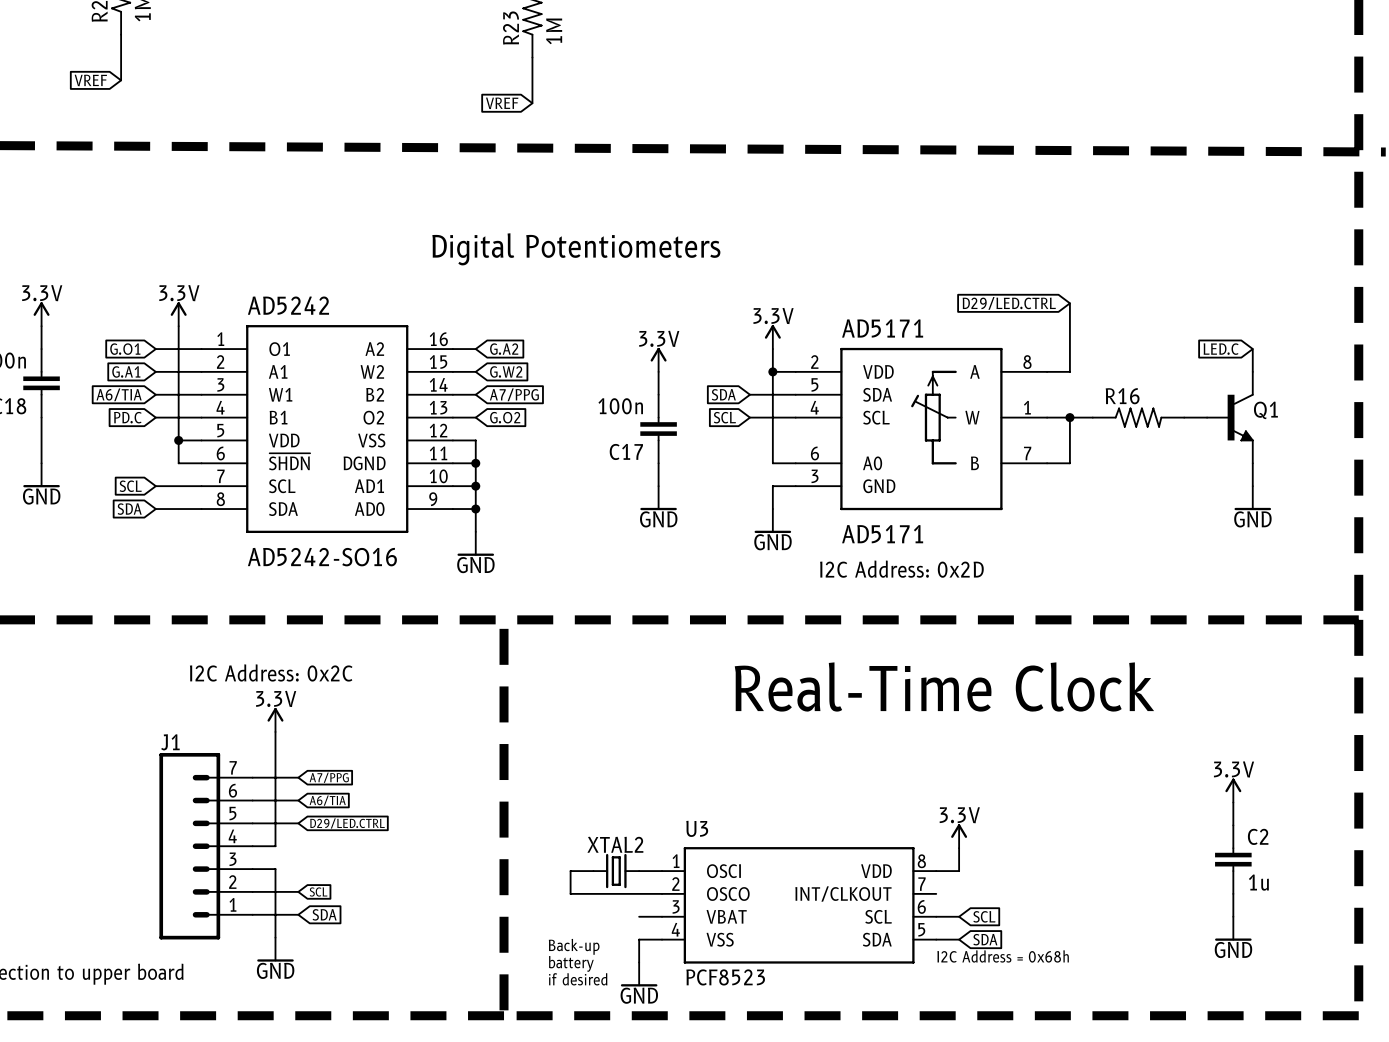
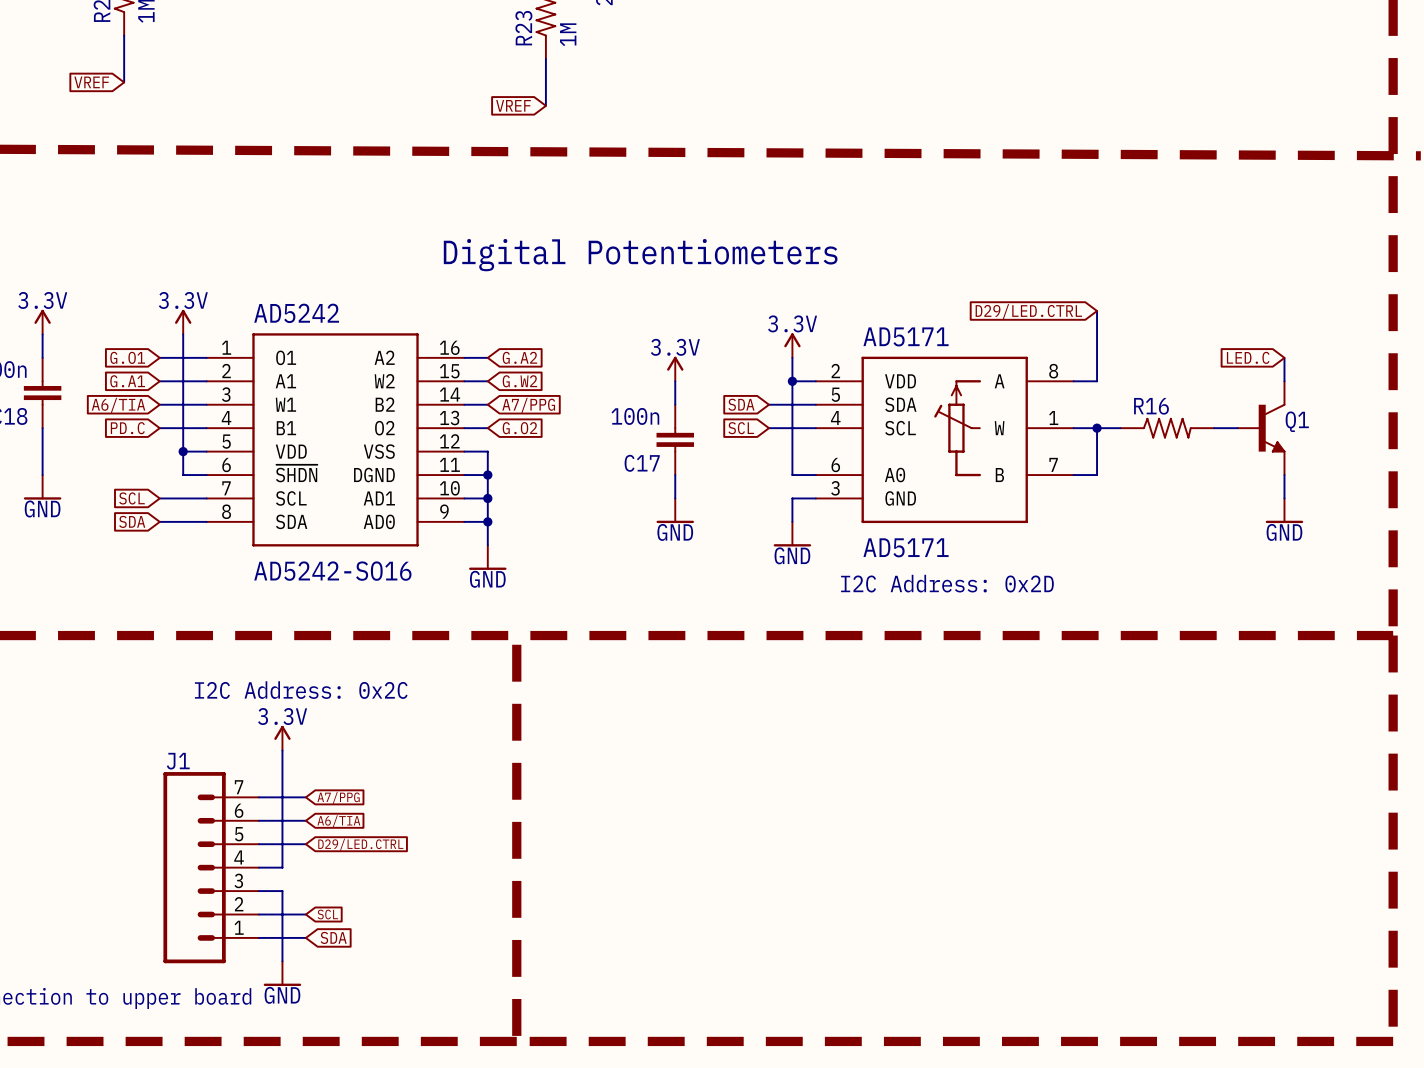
text: Real-Time Clock (944, 686) -> none
power symbol: 3.3V (1233, 790) -> none
wire: (1233, 802) (1233, 825) -> none
power symbol: 3.3V (959, 836) -> none
wire: (959, 848) (959, 871) (936, 871) -> none
C2: 1u (1233, 859) -> none
wire: (593, 871) (570, 871) (570, 893) (662, 893) -> none
XTAL2: (616, 871) -> none
wire: (639, 871) (662, 871) -> none
wire: (1233, 893) (1233, 916) -> none
U3: PCF8523 (799, 905) -> none
wire: (639, 916) (662, 916) -> none
wire: (936, 916) (959, 916) -> none
global label: SCL (984, 916) -> none
power symbol: GND (1233, 928) -> none
wire: (662, 939) (639, 939) (639, 962) -> none
wire: (936, 939) (959, 939) -> none
global label: SDA (985, 939) -> none
text: Back-up (574, 946) -> none
text: I2C Address = 0x68h (1003, 956) -> none
text: battery (571, 963) -> none
power symbol: GND (639, 974) -> none
text: if desired (578, 979) -> none

